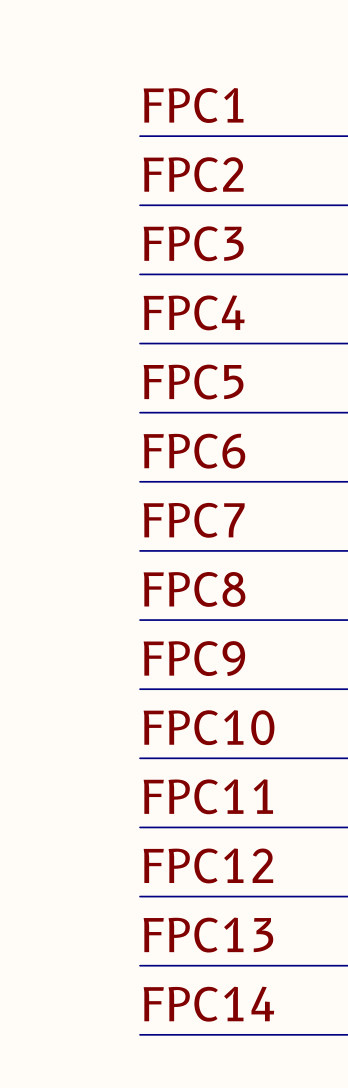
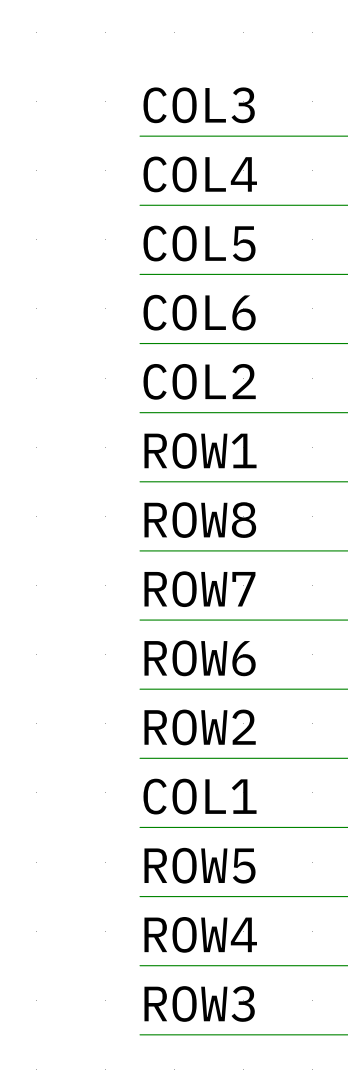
label: FPC1 (193, 105) -> COL3 (199, 105)
label: FPC2 (193, 174) -> COL4 (200, 174)
label: FPC3 (193, 243) -> COL5 (199, 243)
label: FPC4 (194, 312) -> COL6 (199, 312)
label: FPC5 (193, 382) -> COL2 (199, 381)
label: FPC6 (194, 451) -> ROW1 (200, 450)
label: FPC7 (194, 520) -> ROW8 (200, 520)
label: FPC8 (194, 589) -> ROW7 (199, 589)
label: FPC9 (194, 658) -> ROW6 (200, 658)
label: FPC10 (209, 727) -> ROW2 (200, 727)
label: FPC11 (208, 796) -> COL1 (200, 796)
label: FPC12 (208, 865) -> ROW5 (200, 865)
label: FPC13 (208, 935) -> ROW4 (200, 934)
label: FPC14 (208, 1004) -> ROW3 (199, 1003)

